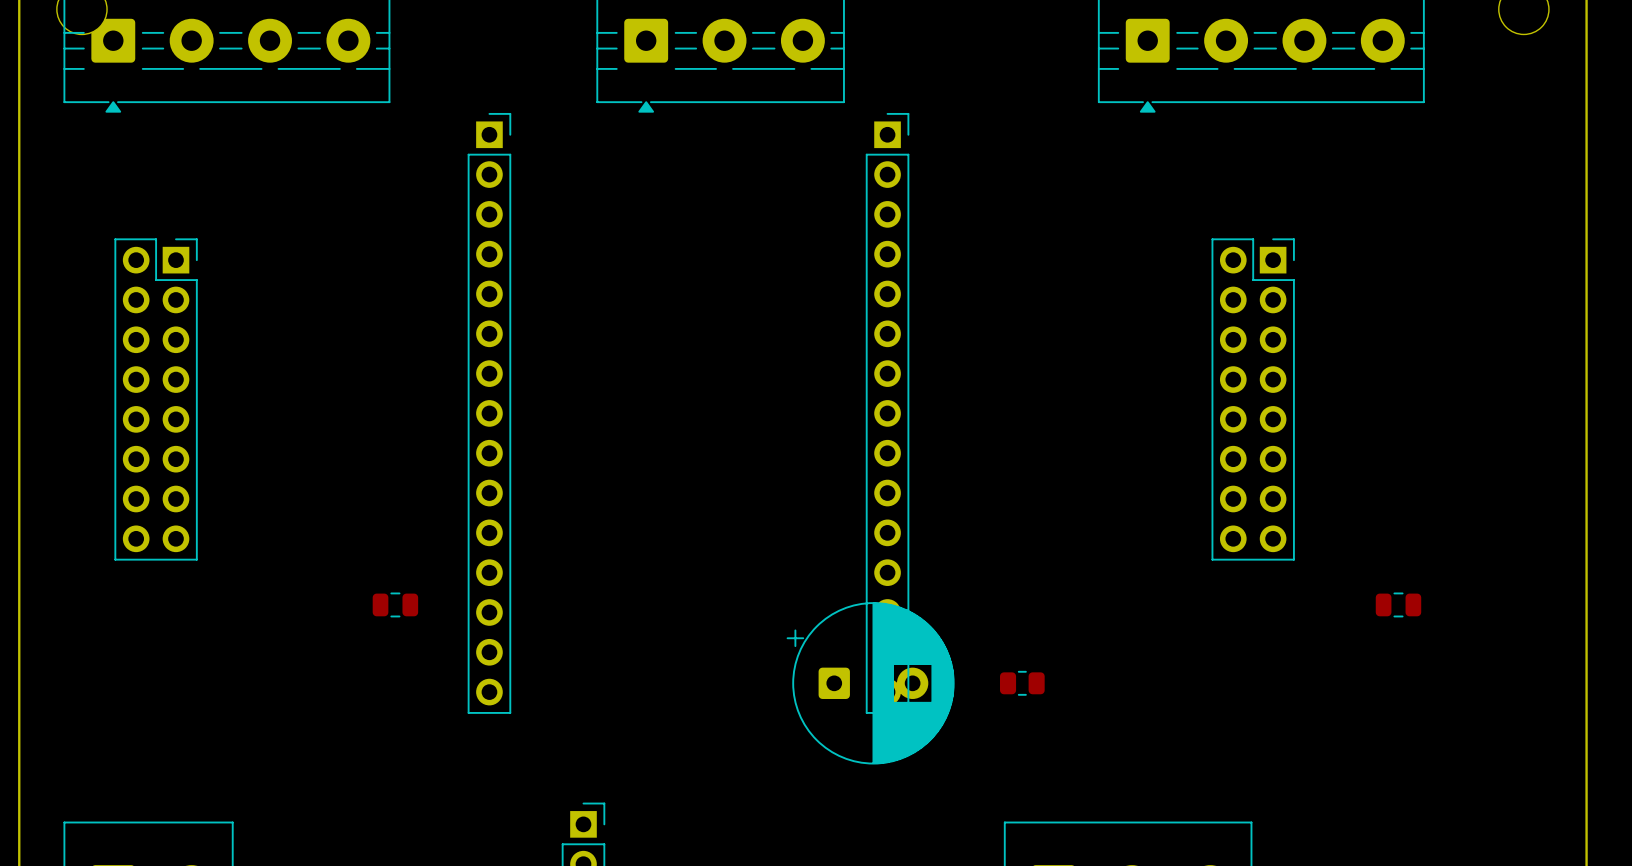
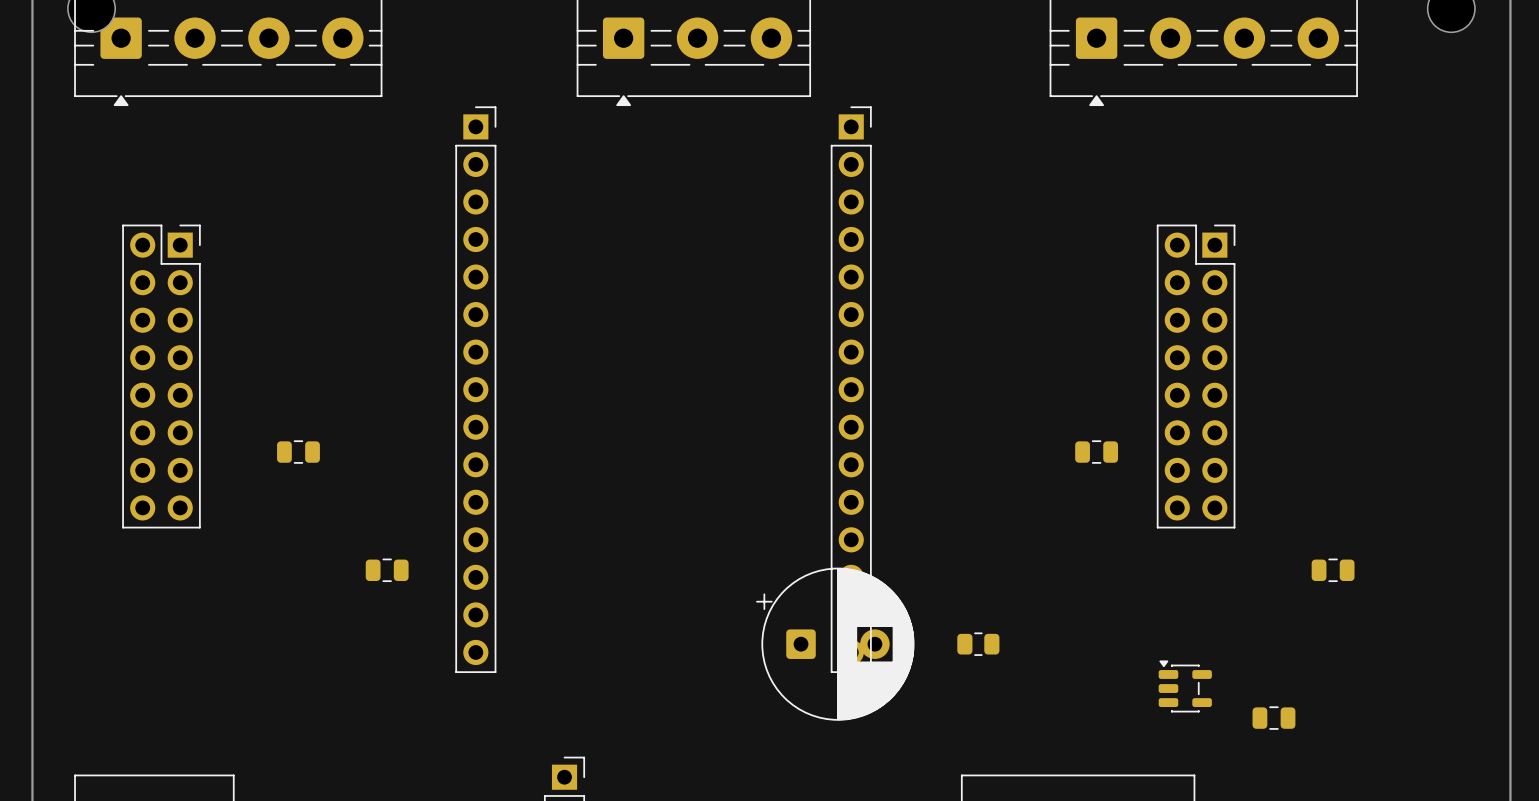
part: none -> (298, 452)
part: none -> (1096, 452)
part: none -> (1185, 686)
part: none -> (1273, 718)

